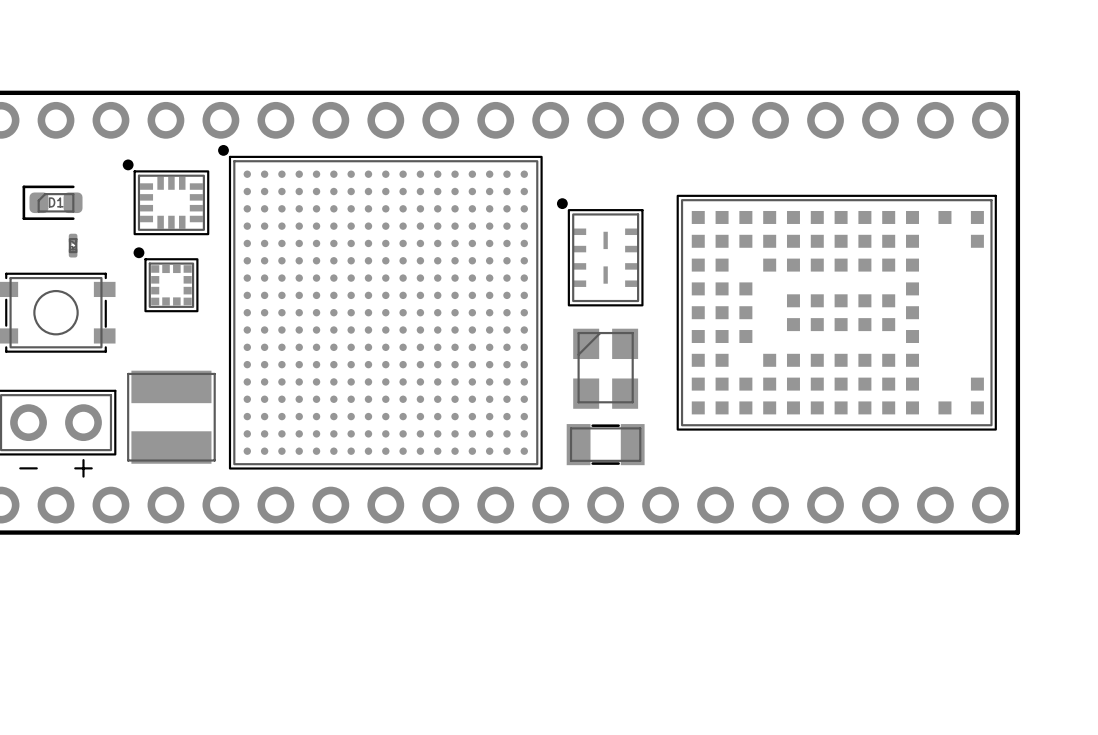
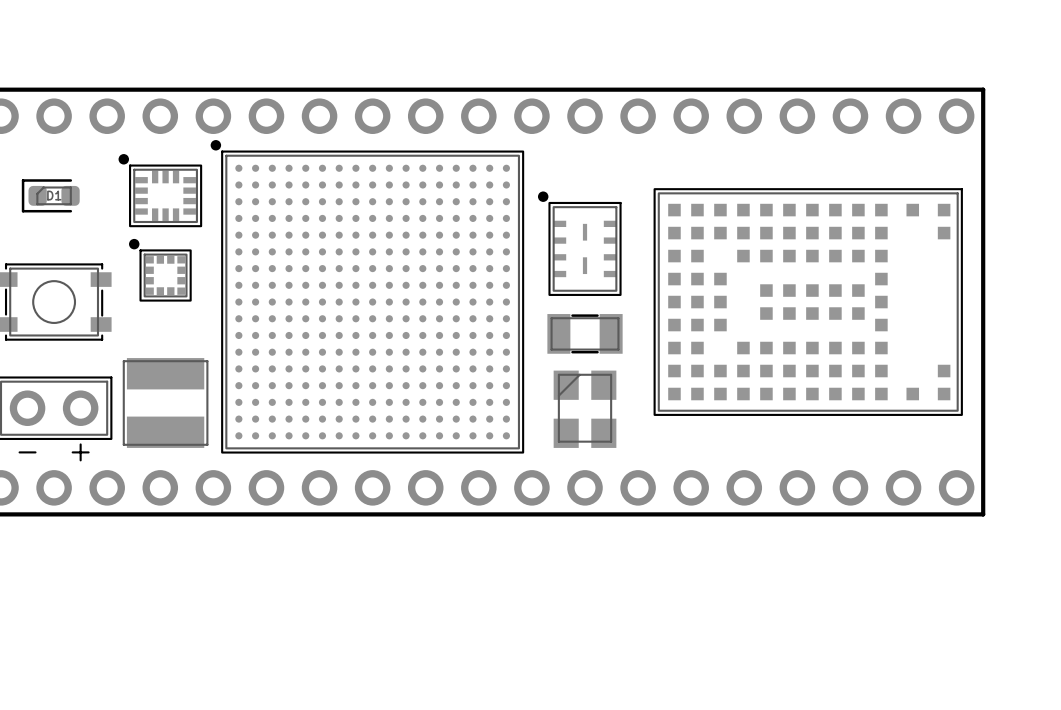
part: (73, 245) -> none
part: none -> (585, 333)
part: (605, 368) -> none
part footprint: [566, 424, 645, 466] -> [553, 370, 617, 448]

